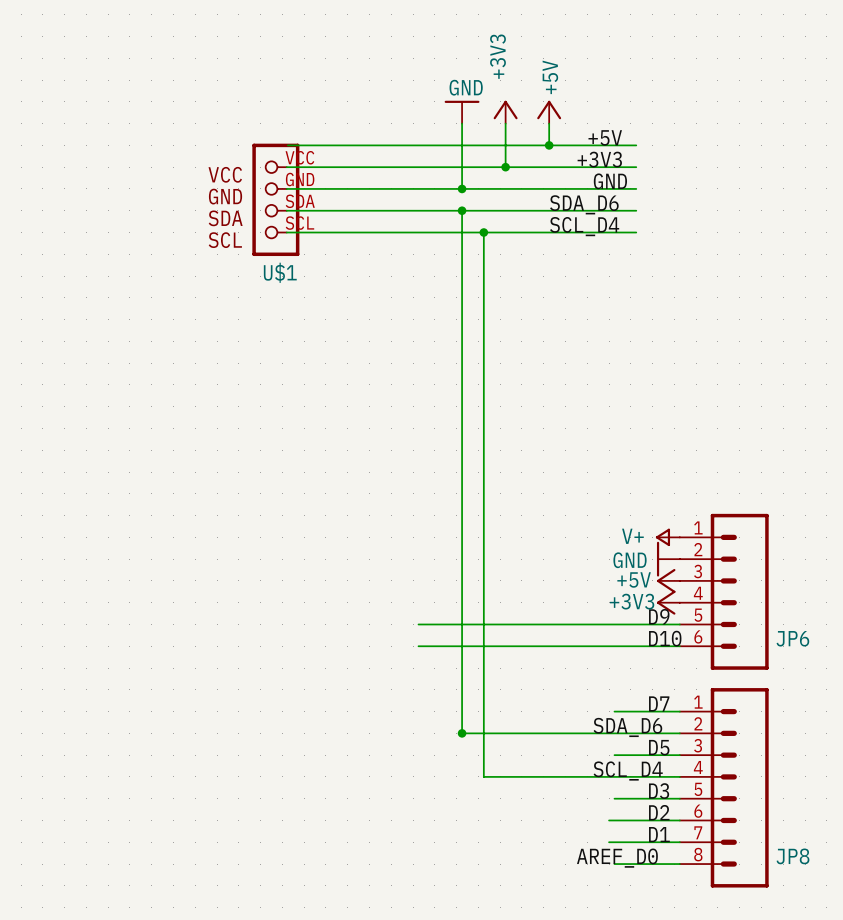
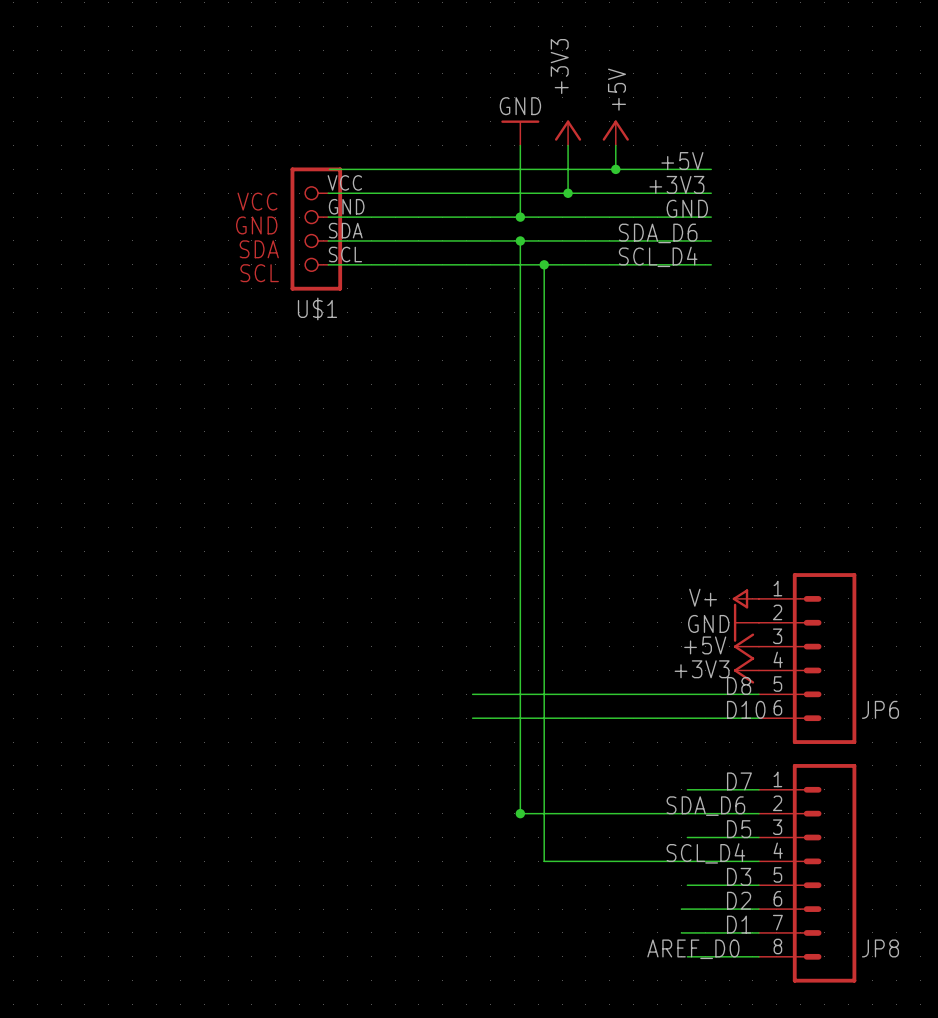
label: D9 (659, 616) -> D8 (739, 685)

